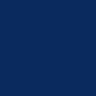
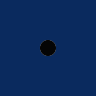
part: none -> (47, 47)

